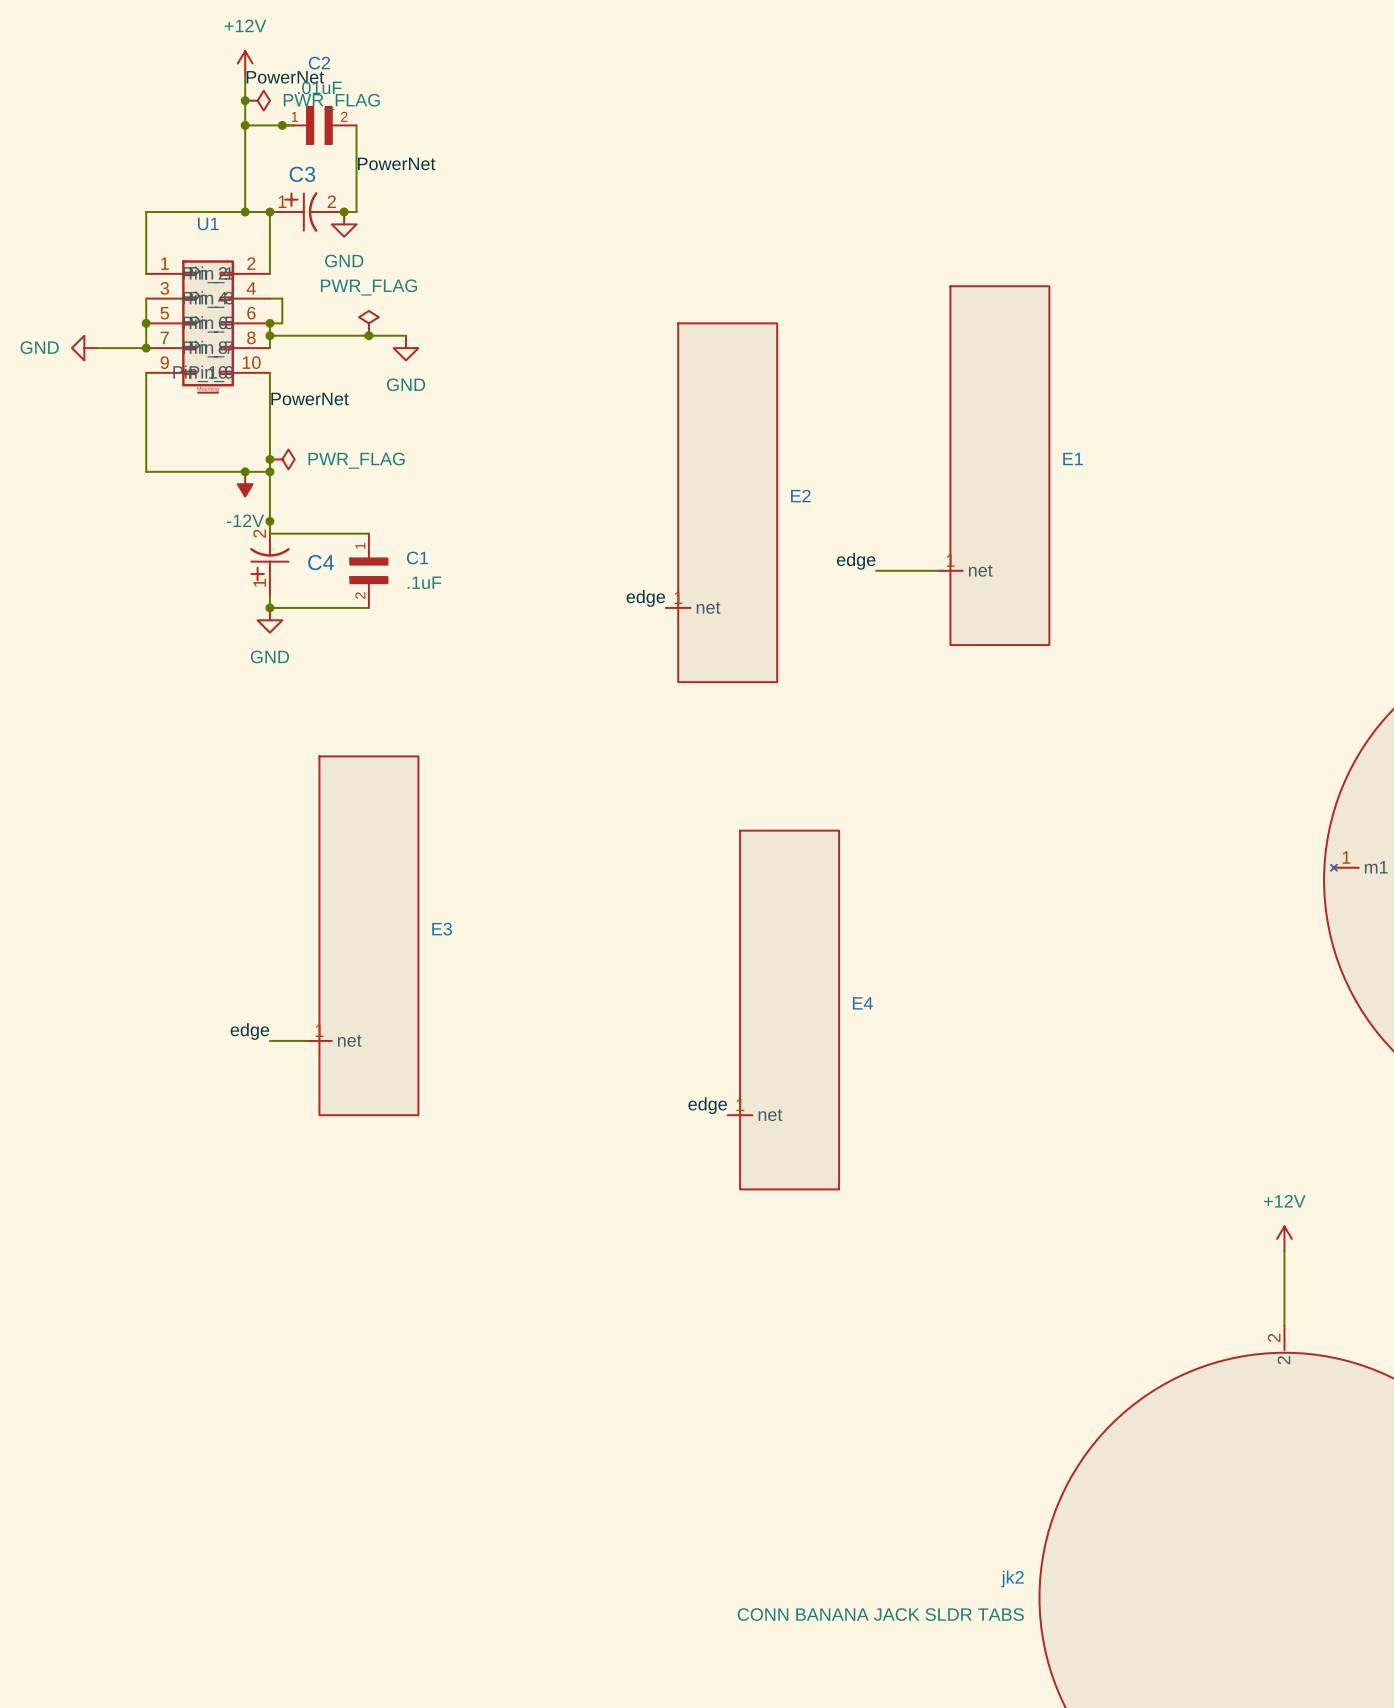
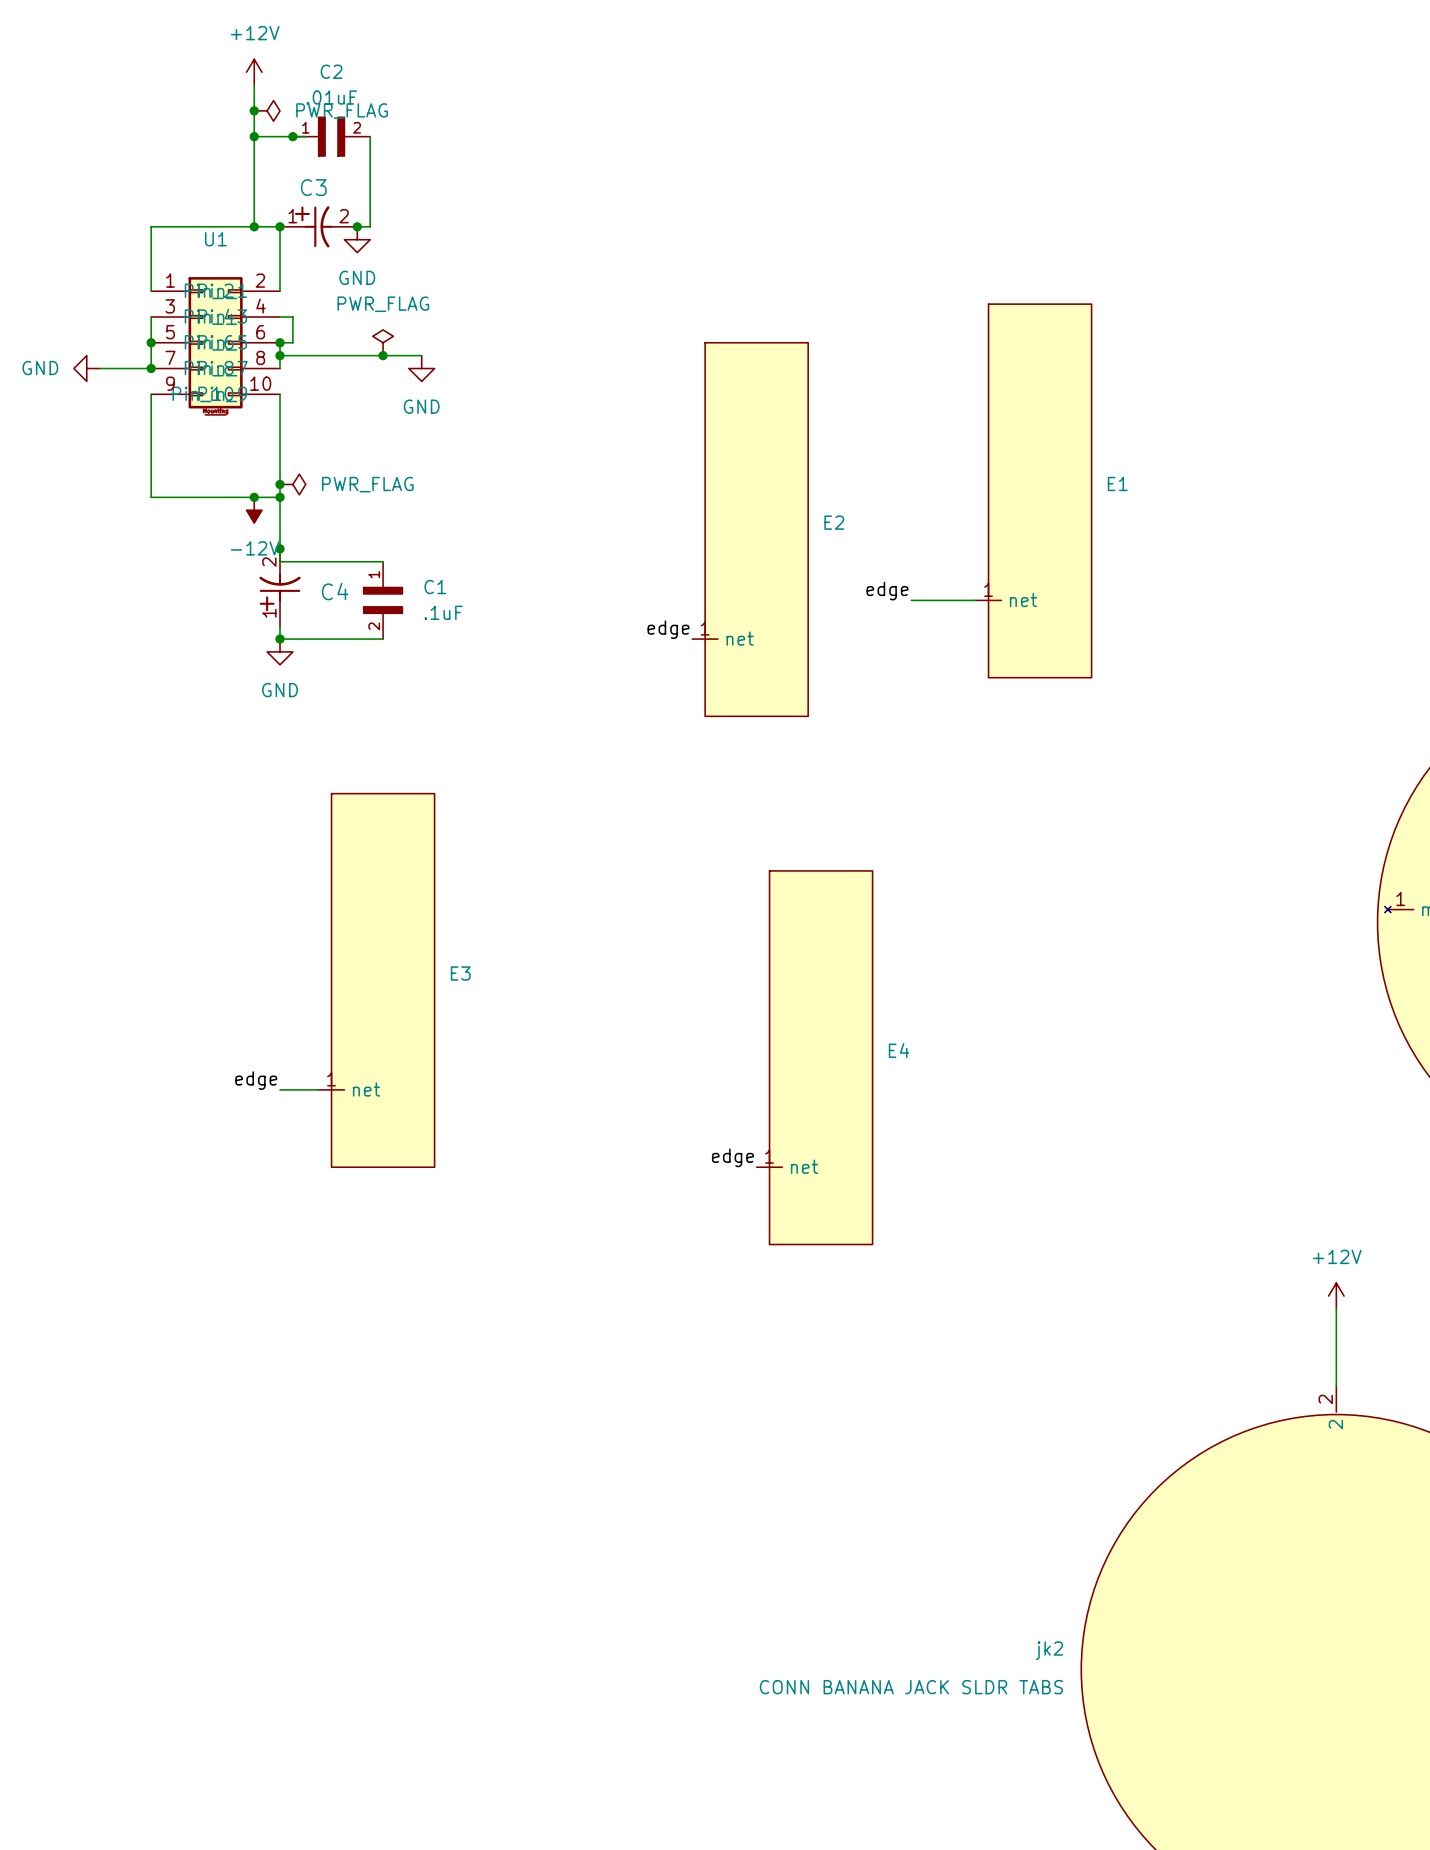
label: PowerNet (285, 77) -> none
label: PowerNet (396, 163) -> none
label: PowerNet (310, 399) -> none

